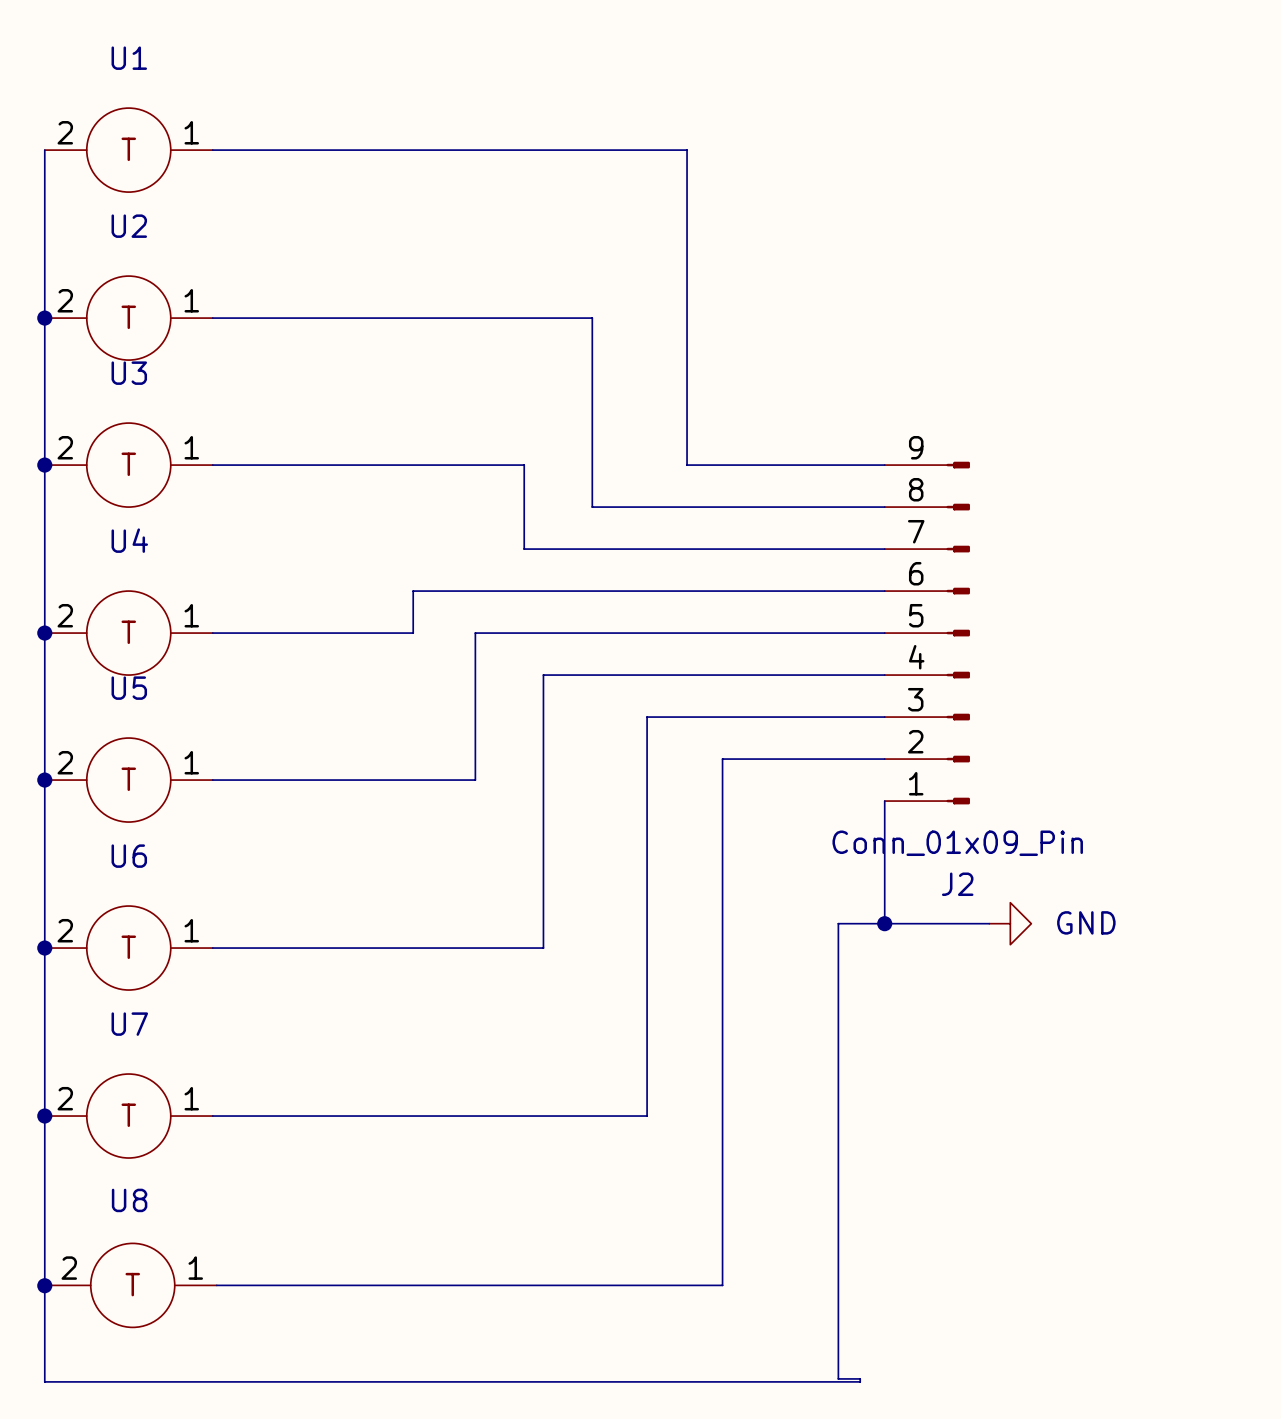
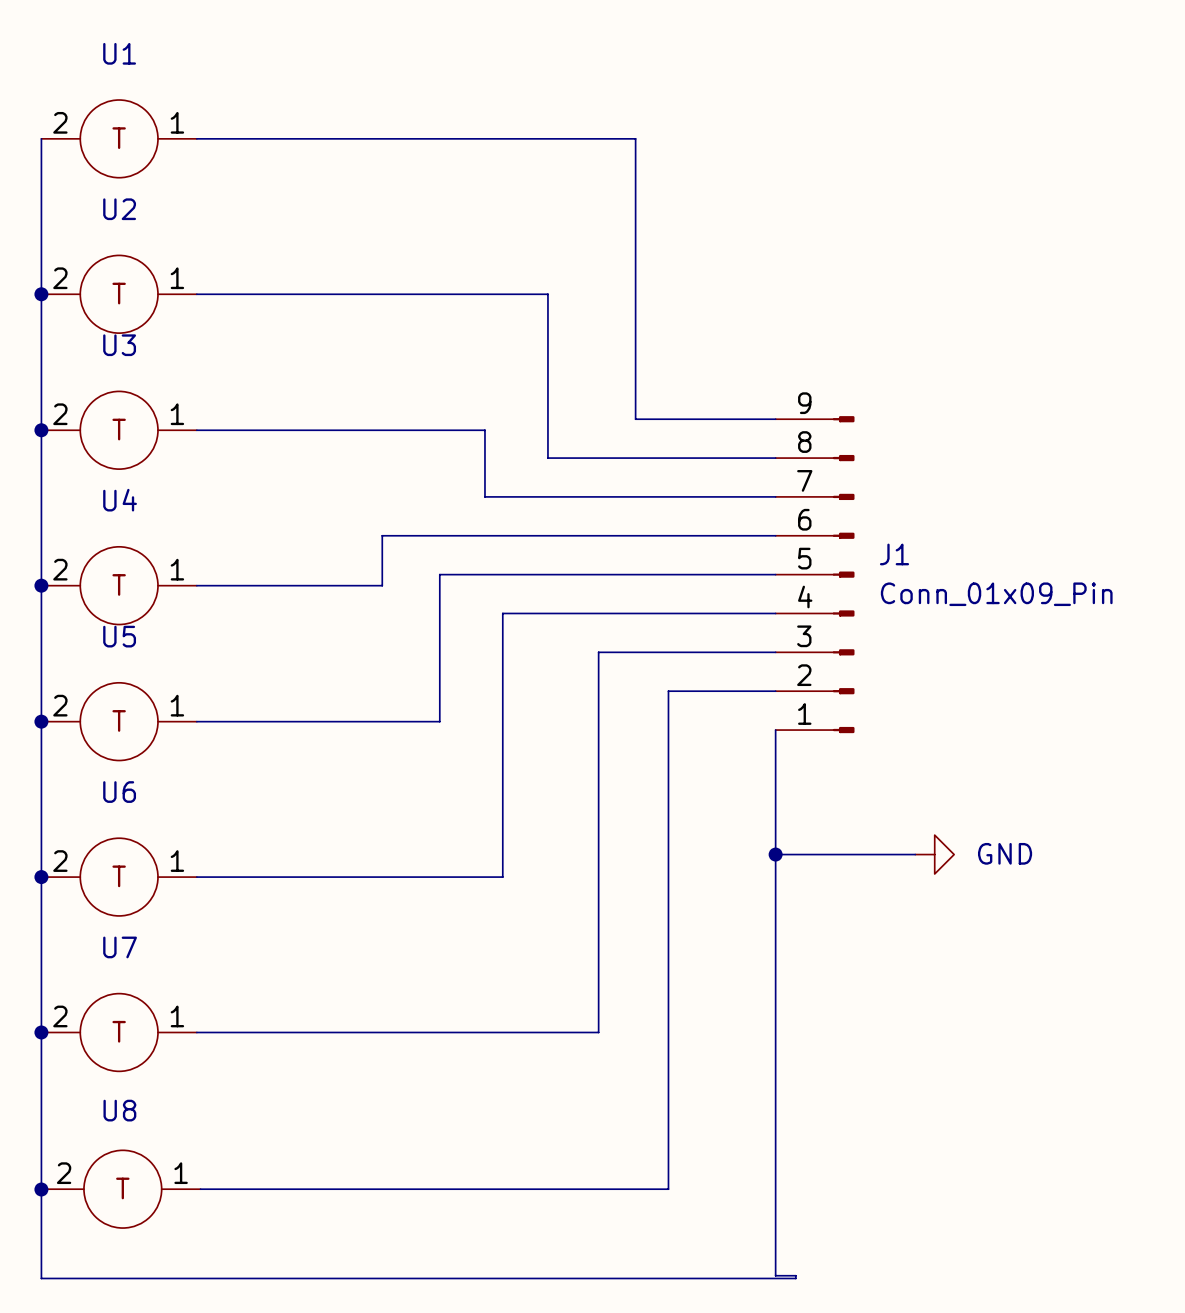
wire: (687, 453) (687, 465) (884, 465) -> (635, 419) (775, 419)
wire: (592, 495) (592, 507) (884, 507) -> (547, 458) (775, 458)
wire: (524, 537) (524, 549) (884, 549) -> (484, 496) (775, 496)
wire: (413, 591) (884, 591) -> (382, 546) (382, 535) (775, 535)
J1: none -> Conn_01x09_Pin (815, 574)
wire: (475, 633) (884, 633) -> (439, 585) (439, 574) (775, 574)
J2: Conn_01x09_Pin (927, 633) -> none
wire: (543, 675) (884, 675) -> (502, 624) (502, 613) (775, 613)
wire: (647, 717) (884, 717) -> (598, 663) (598, 652) (775, 652)
wire: (722, 759) (884, 759) -> (668, 702) (668, 691) (775, 691)
wire: none -> (775, 730) (775, 854)
wire: (884, 801) (884, 923) -> none
junction position: (884, 923) -> (775, 854)

